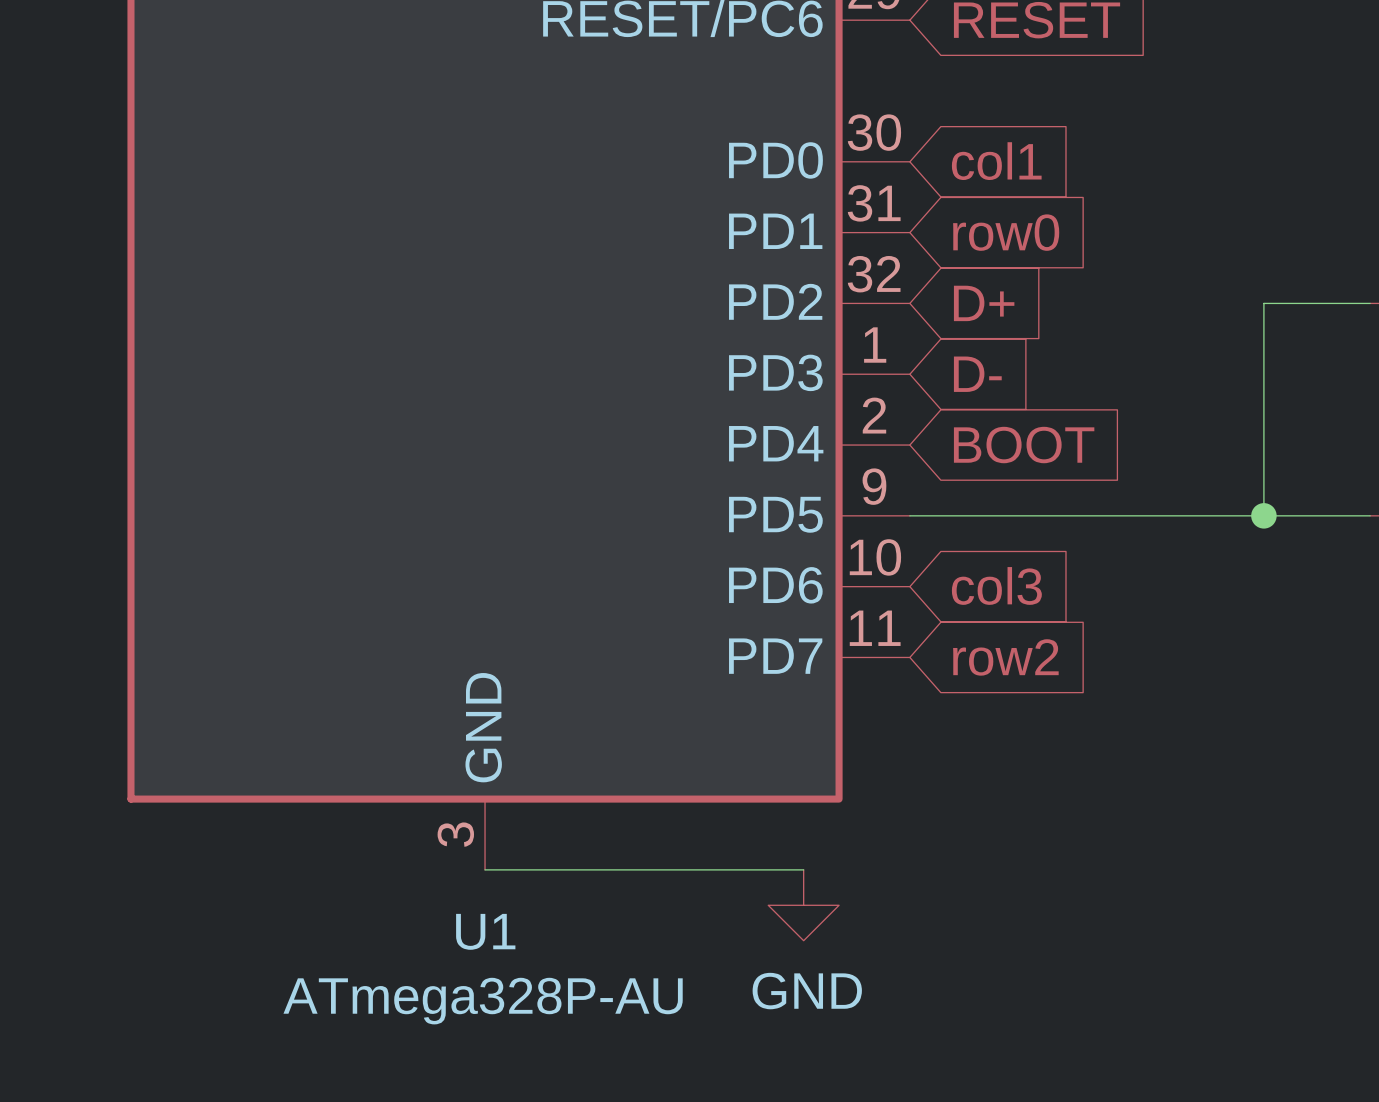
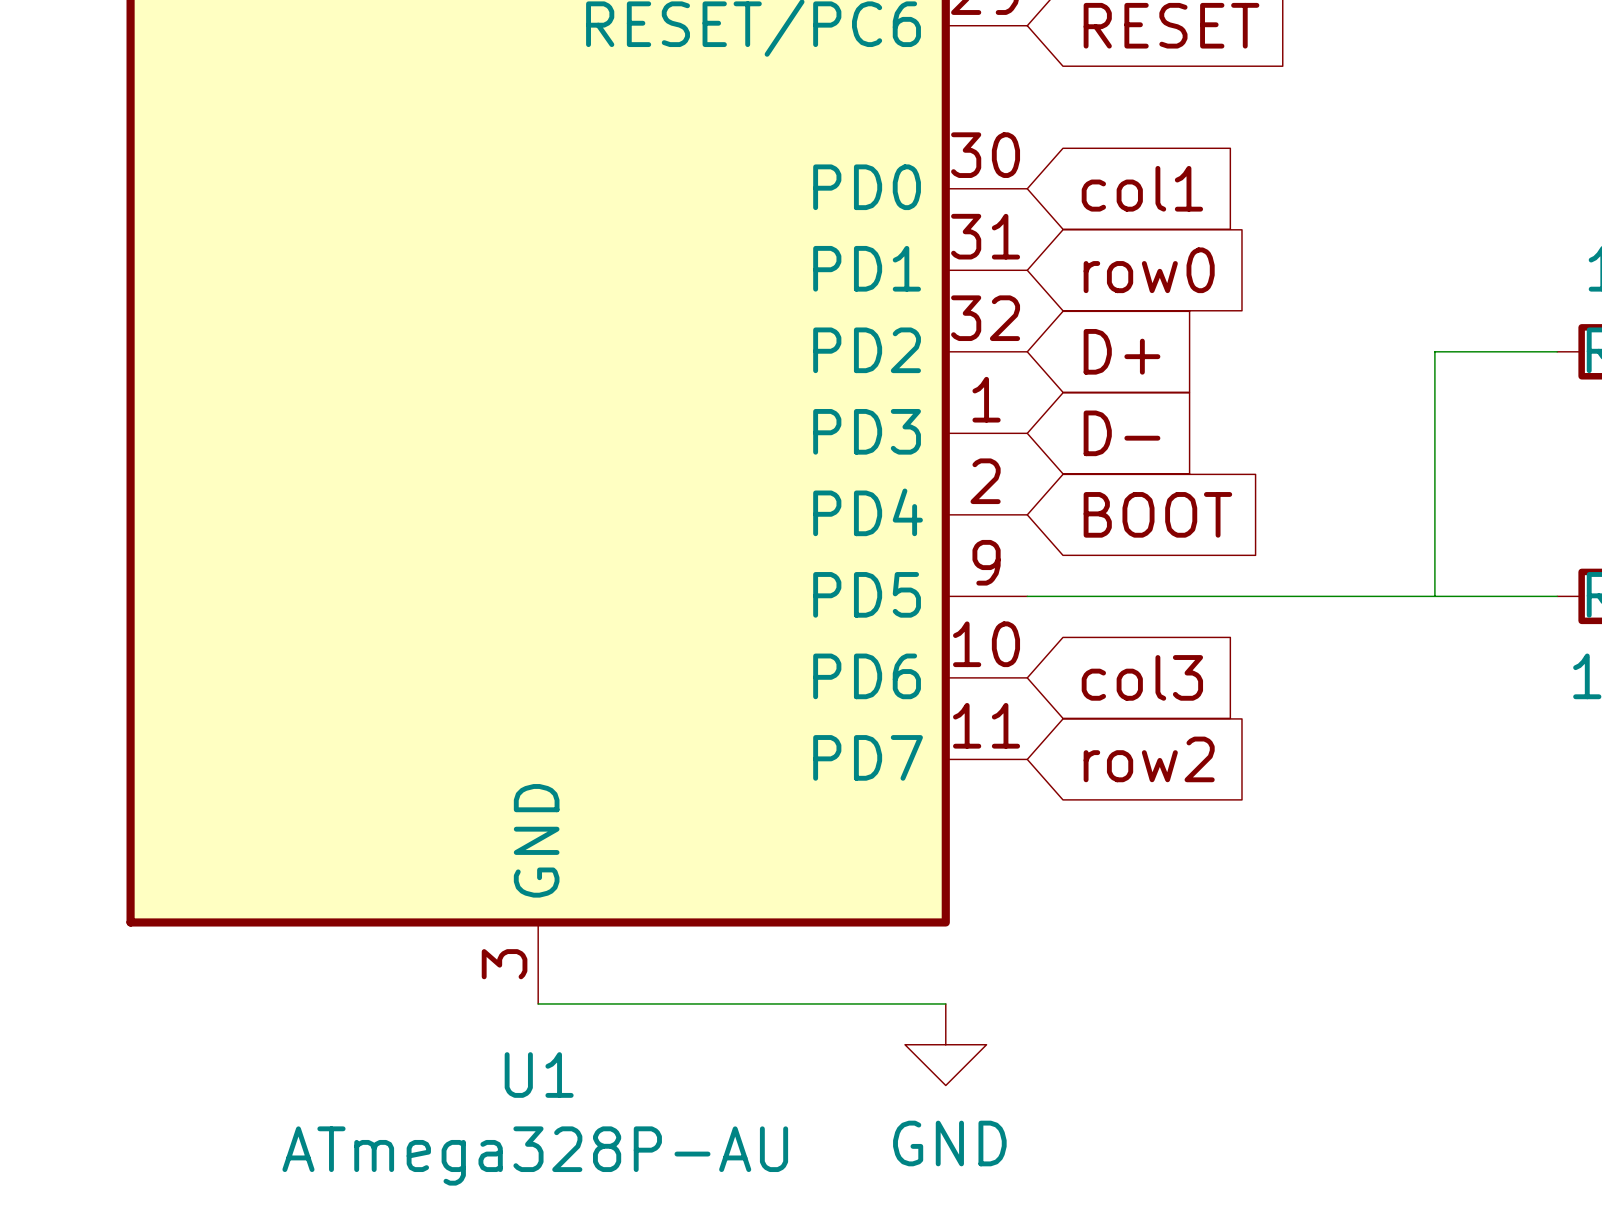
junction: (1263, 515) -> none
wire: none -> (905, 1003) (945, 1003)
power symbol position: GND (803, 905) -> GND (945, 1044)

